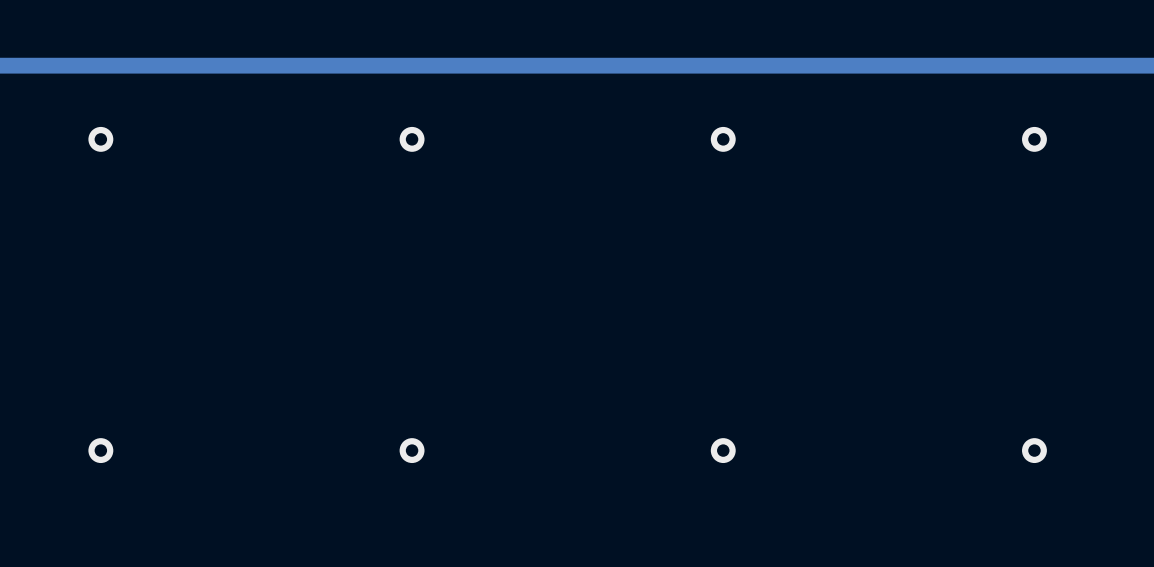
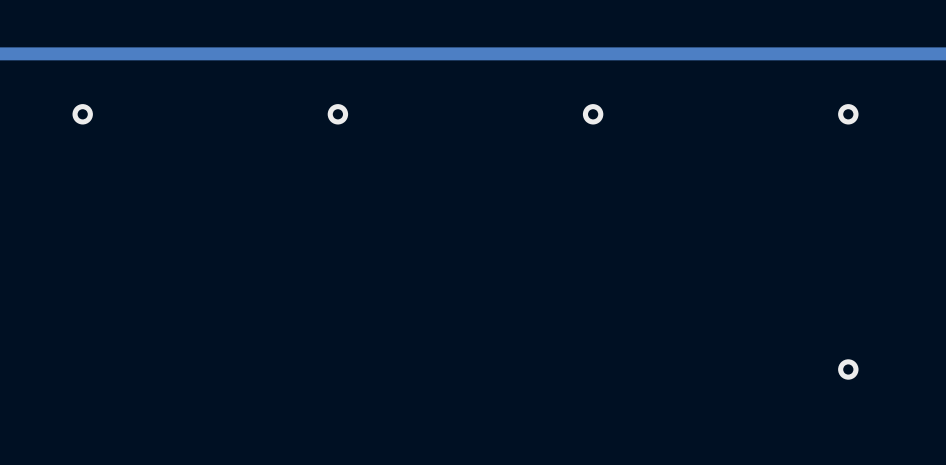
via: (100, 450) -> none
via: (412, 450) -> none
via: (723, 450) -> none

